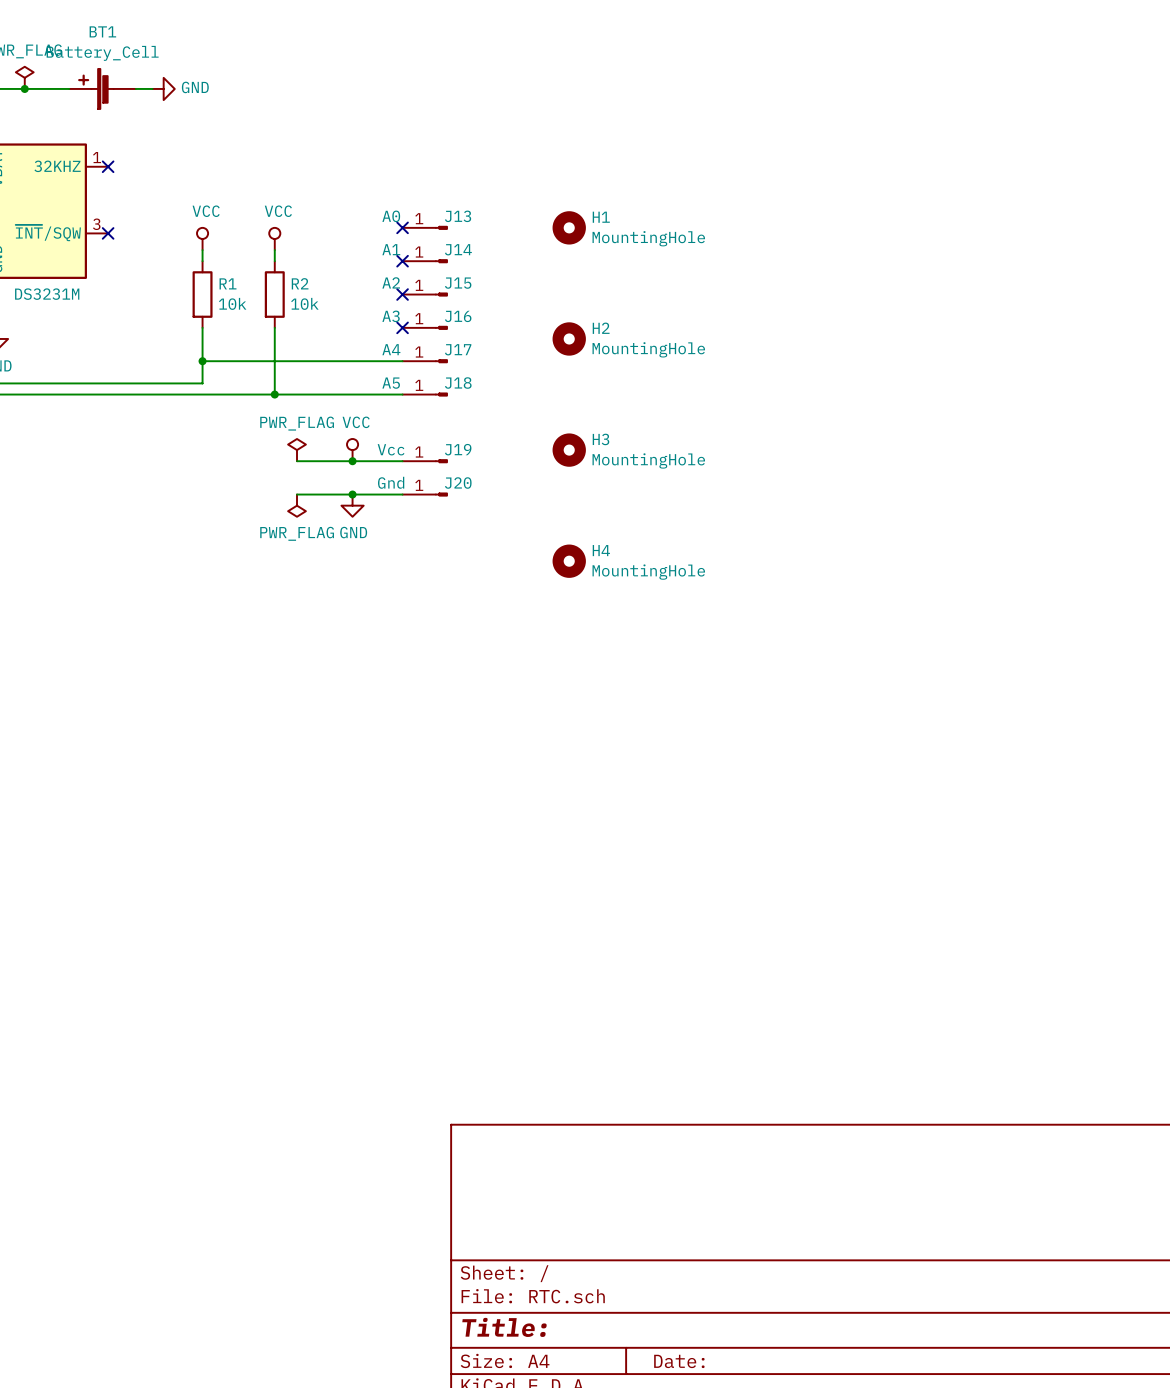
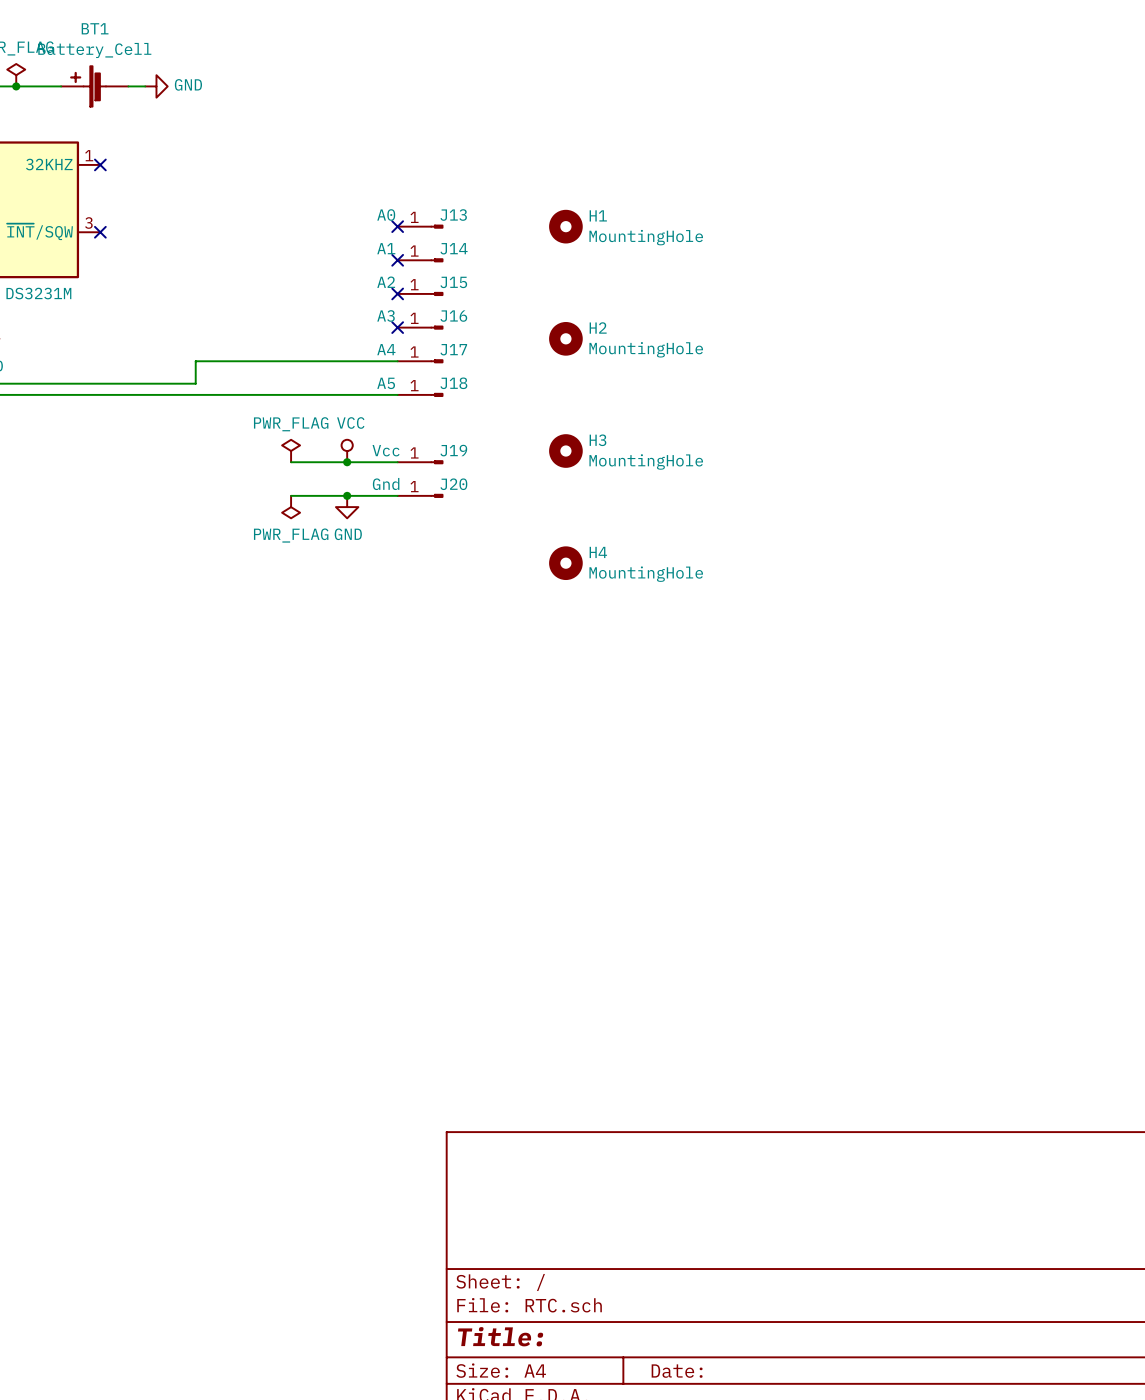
power symbol: VCC (202, 238) -> none
power symbol: VCC (274, 238) -> none
wire: (202, 250) (202, 261) -> none
wire: (274, 250) (274, 261) -> none
R1: 10k (202, 294) -> none
R2: 10k (274, 294) -> none
wire: (202, 327) (202, 361) -> none
wire: (274, 327) (274, 394) -> none
junction: (202, 361) -> none
junction: (274, 394) -> none

